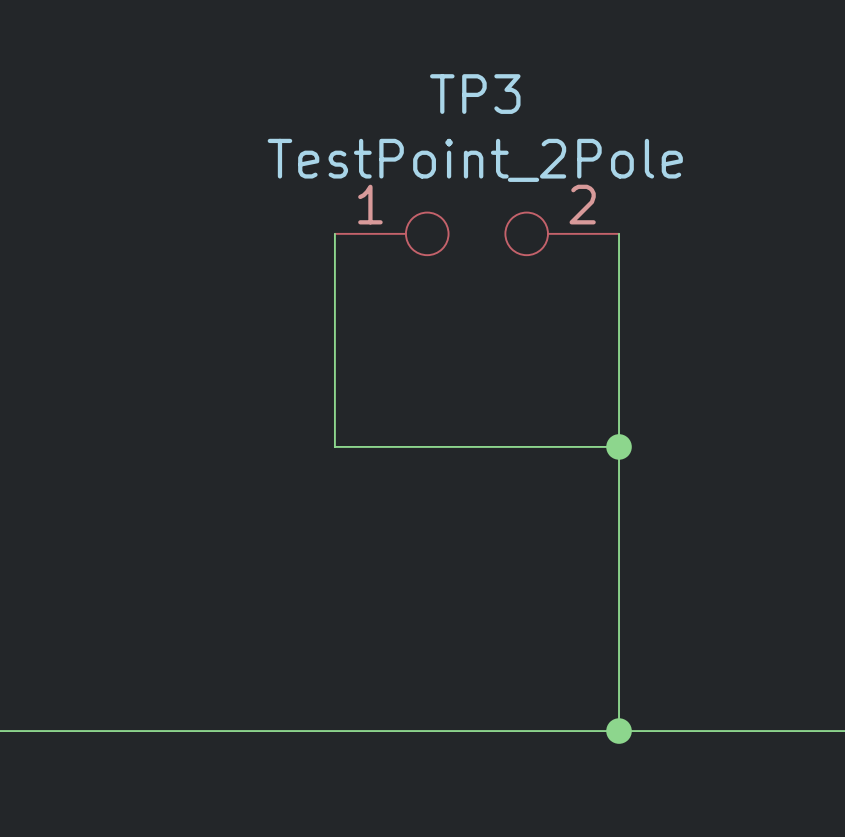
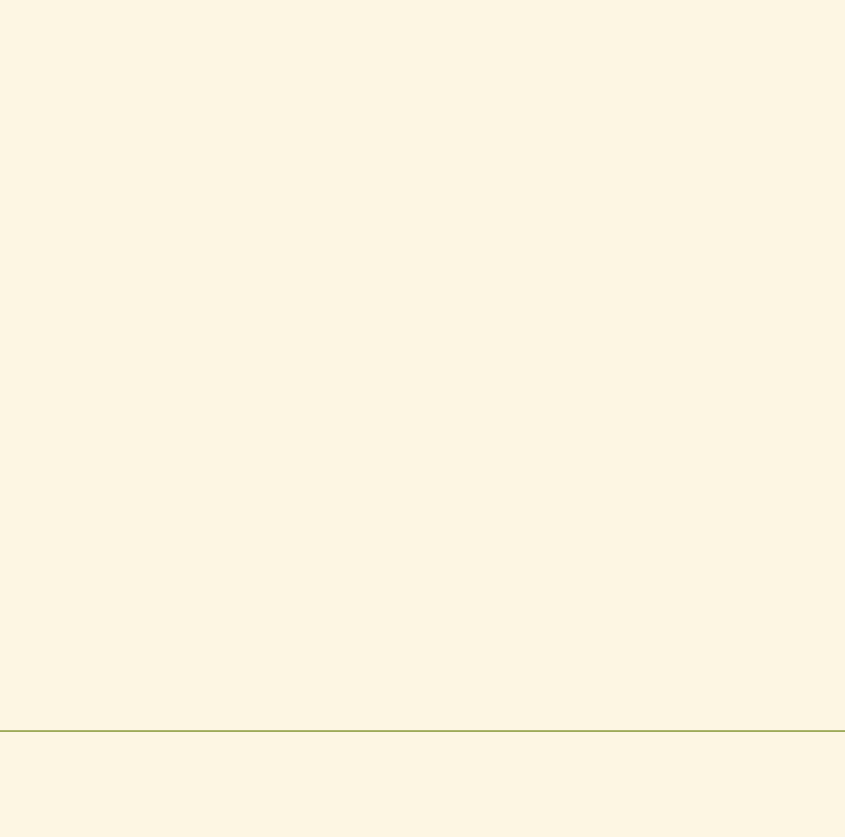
wire: (334, 233) (334, 446) (619, 446) -> none
TP3: TestPoint_2Pole (476, 233) -> none
wire: (619, 233) (619, 731) -> none
junction: (619, 446) -> none
junction: (619, 731) -> none

